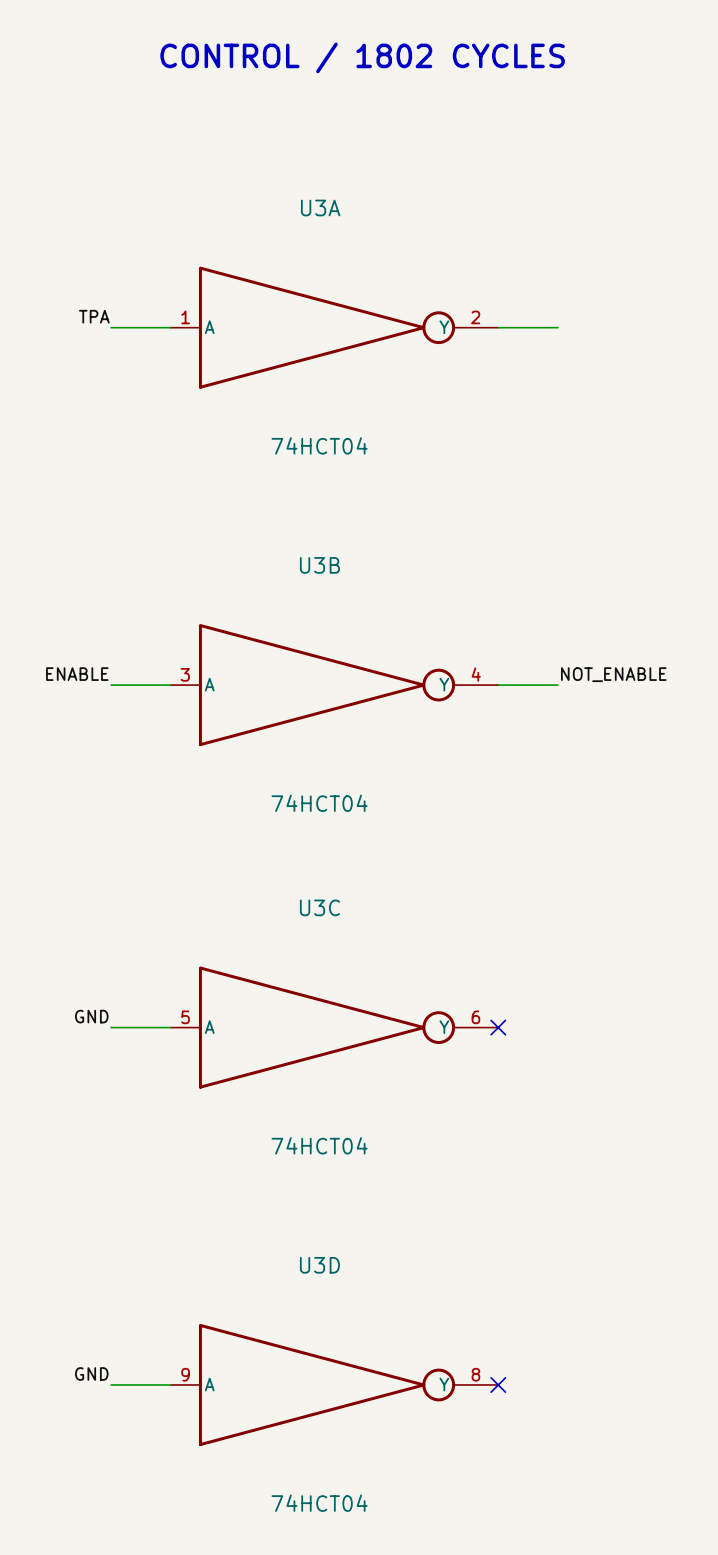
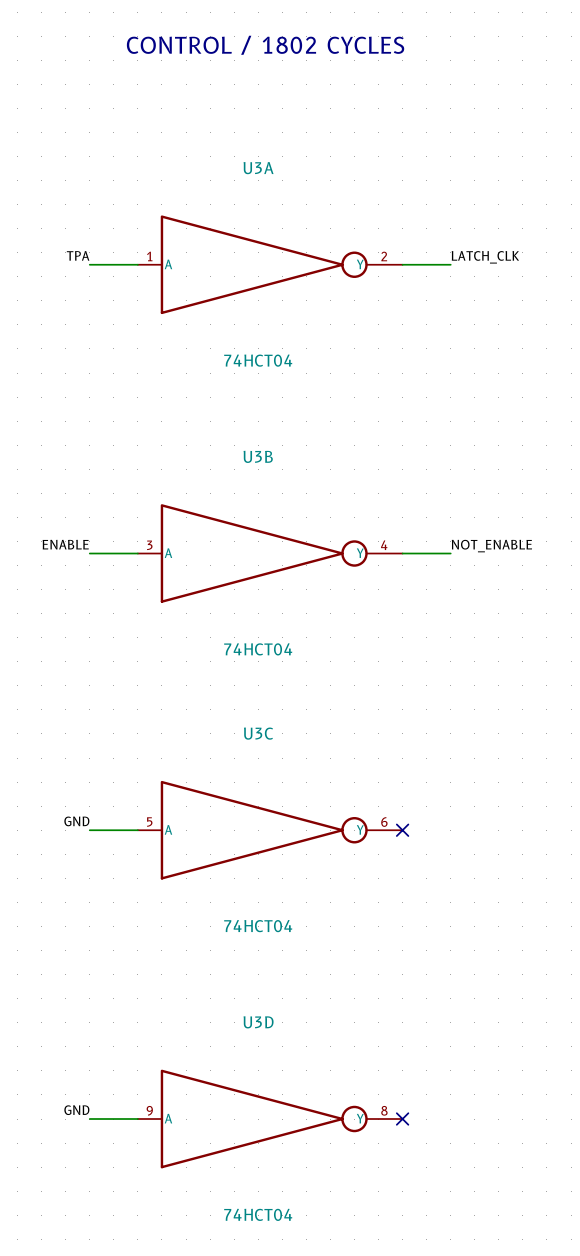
label: none -> LATCH_CLK (485, 257)

